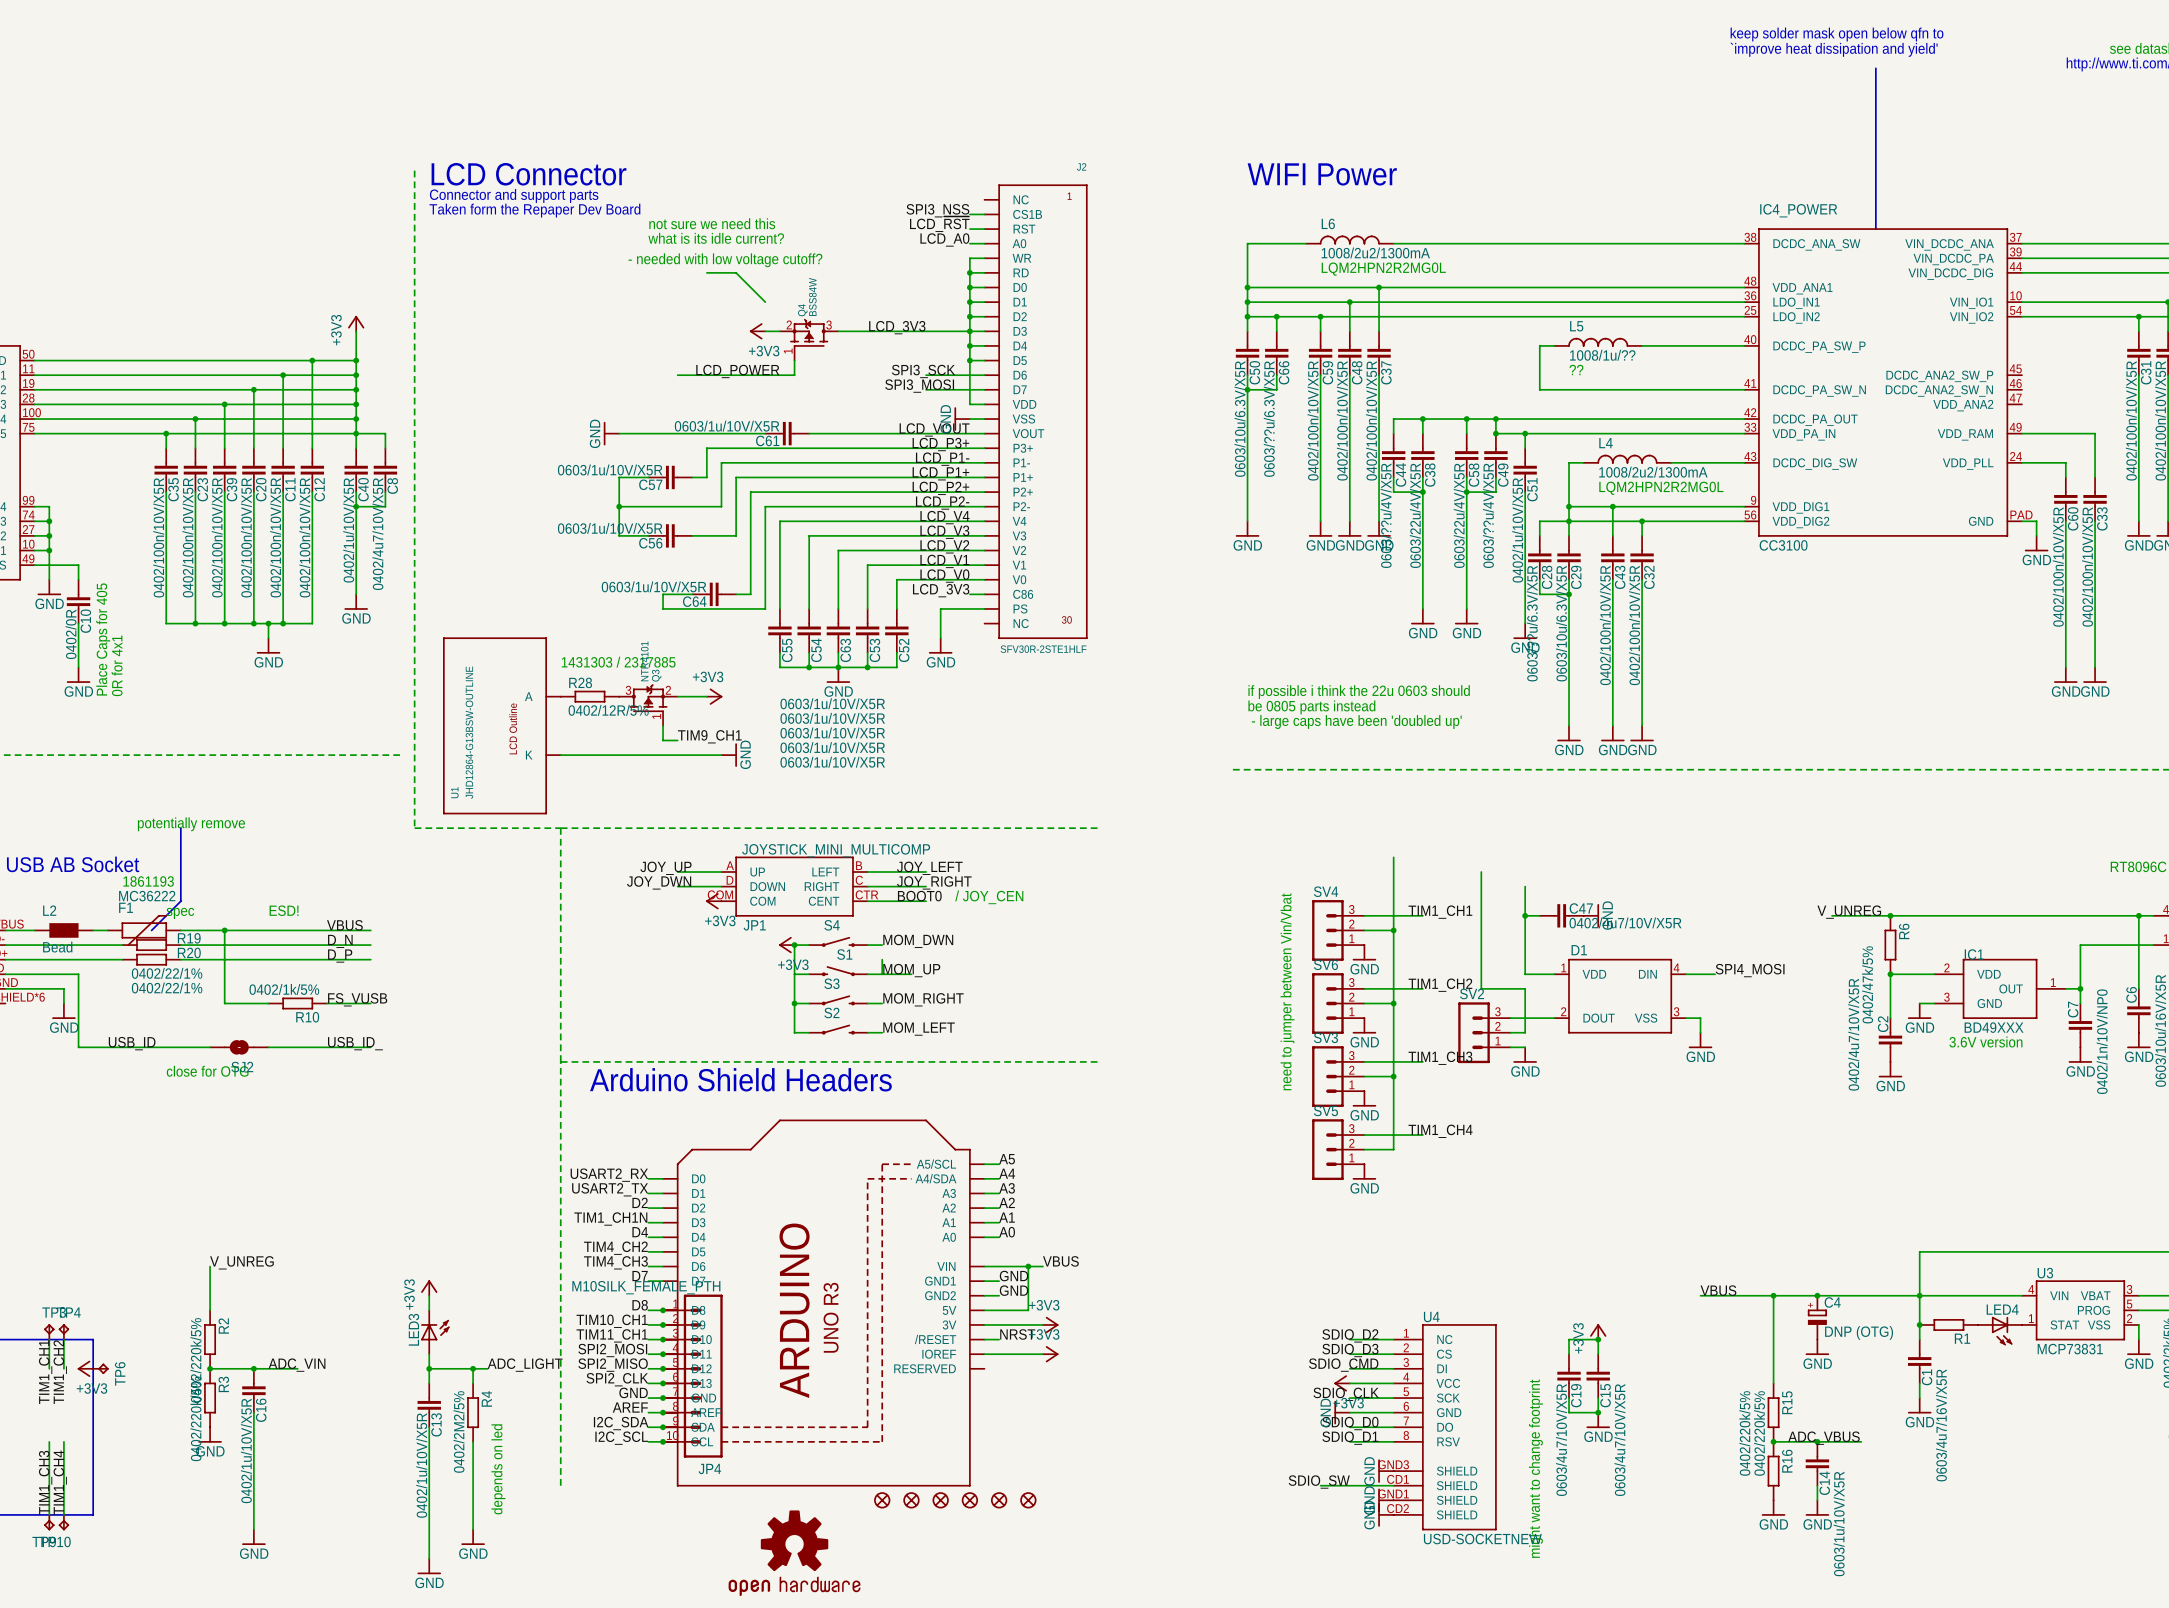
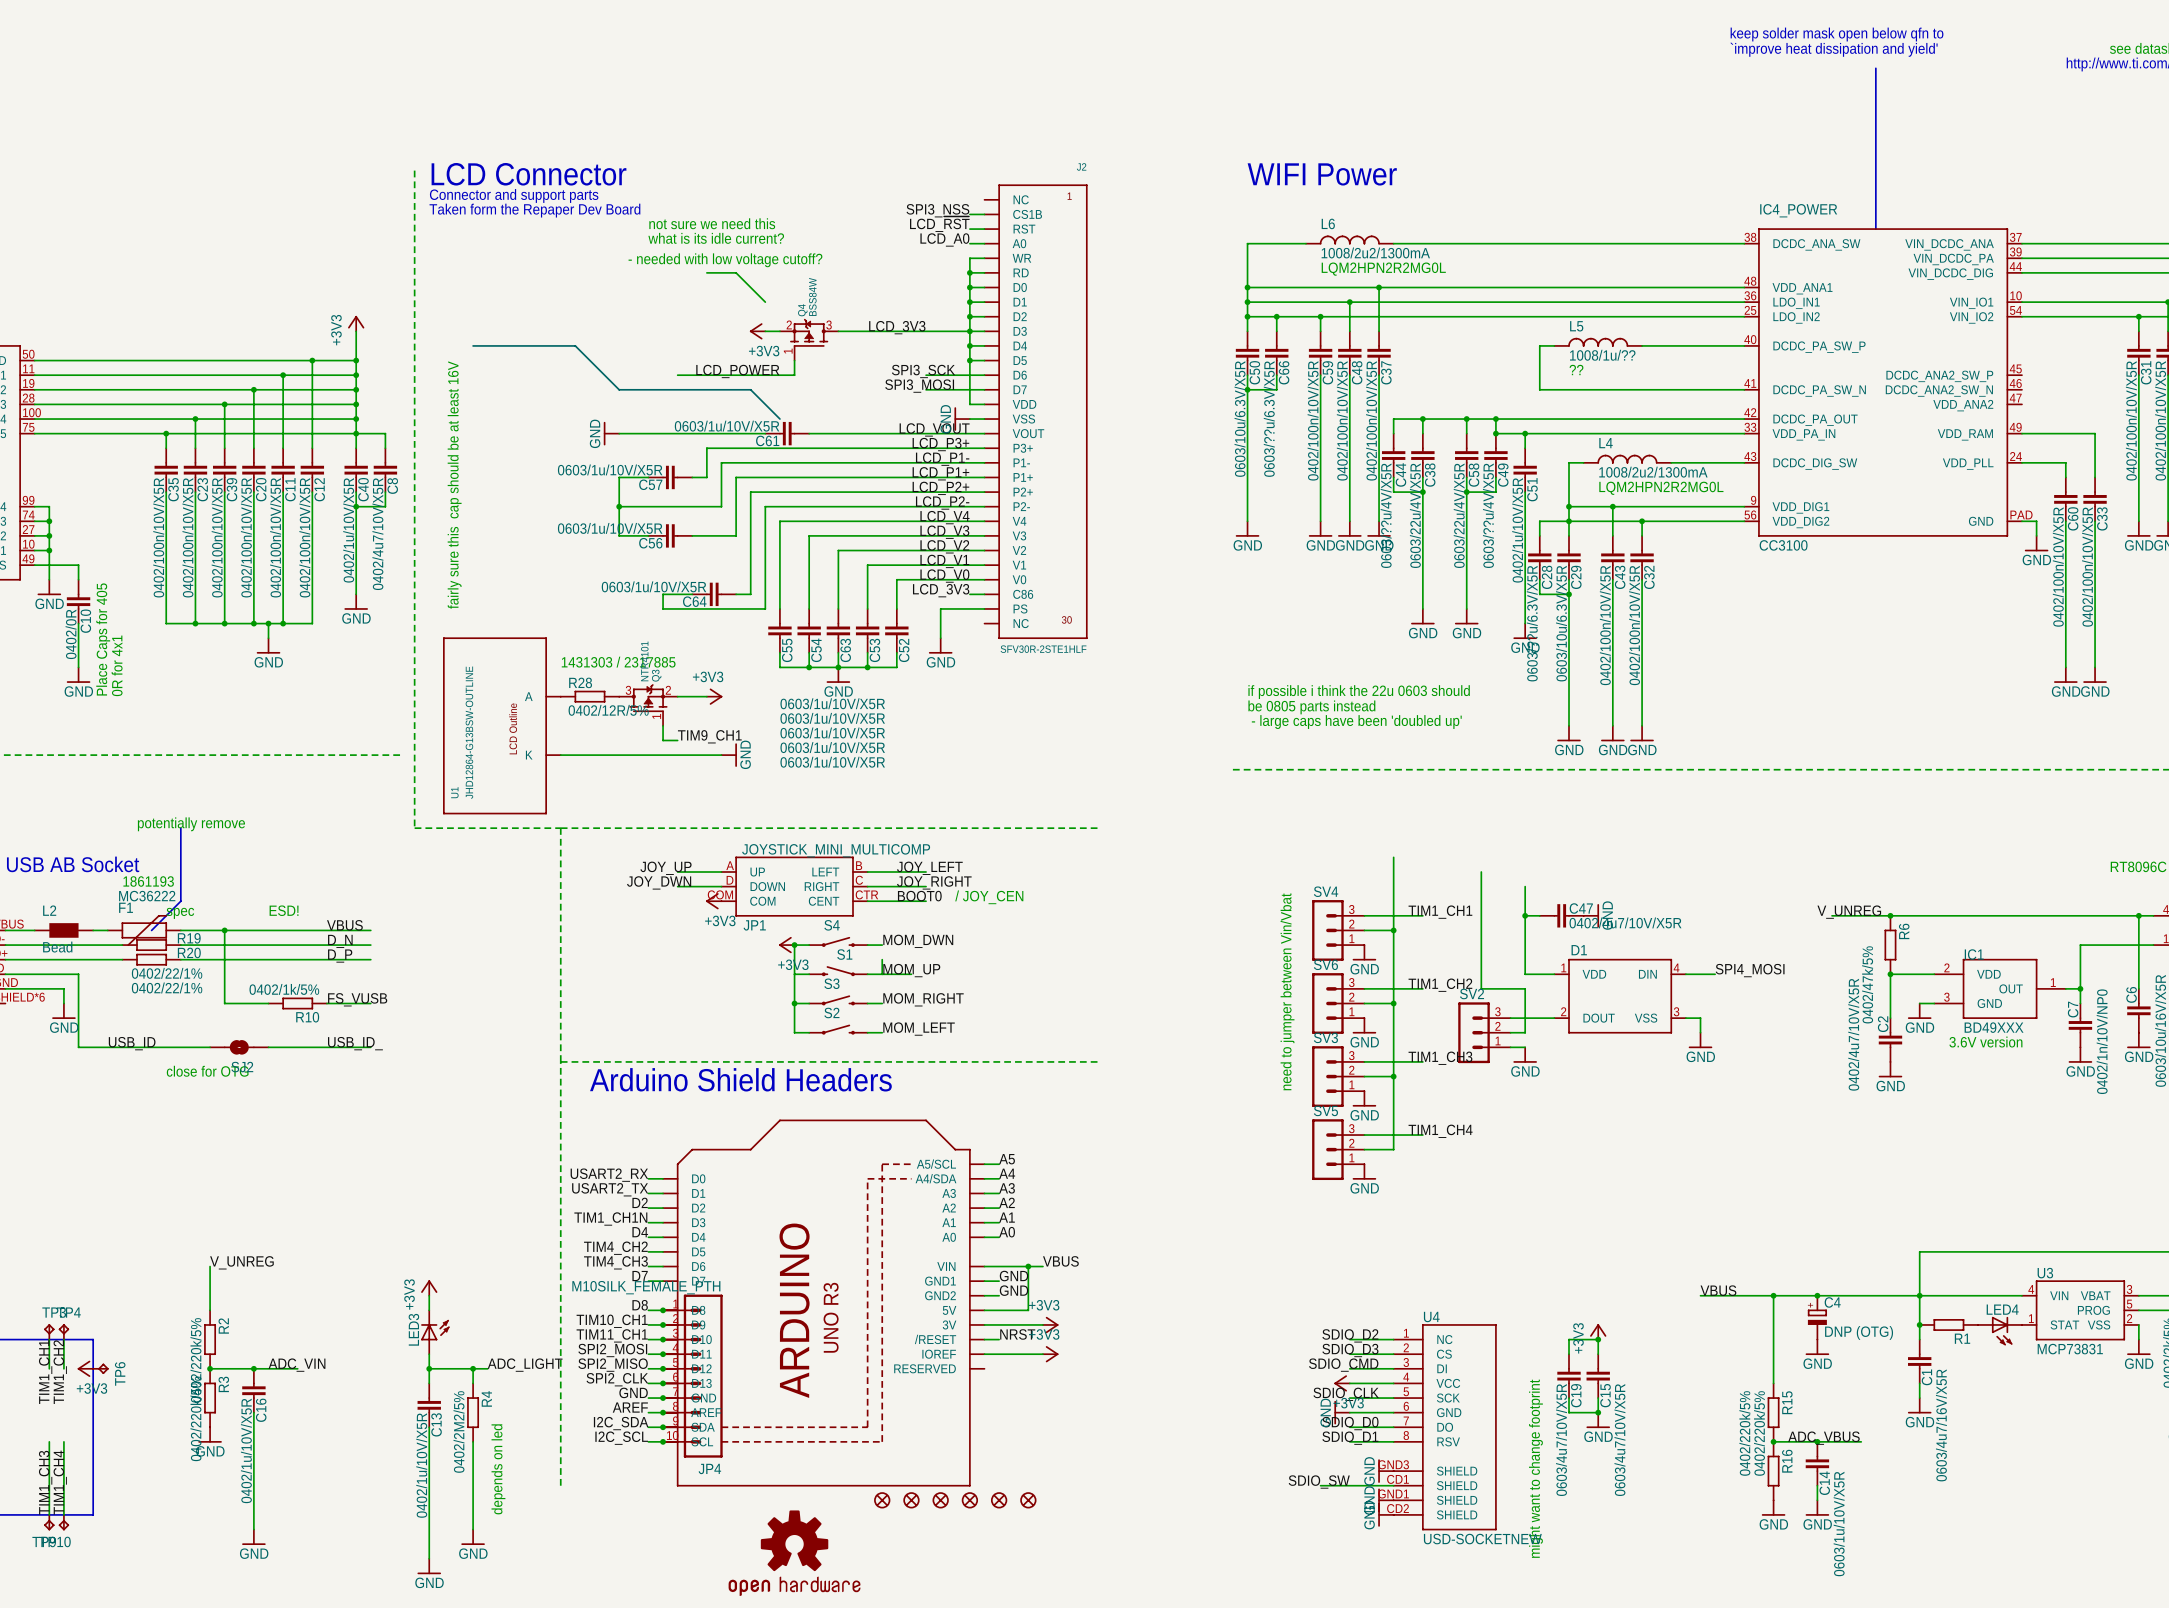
line: none -> (473, 345) (575, 345) (619, 389) (750, 389) (779, 419)
text: none -> fairly sure this cap should be at least 16V (454, 485)

